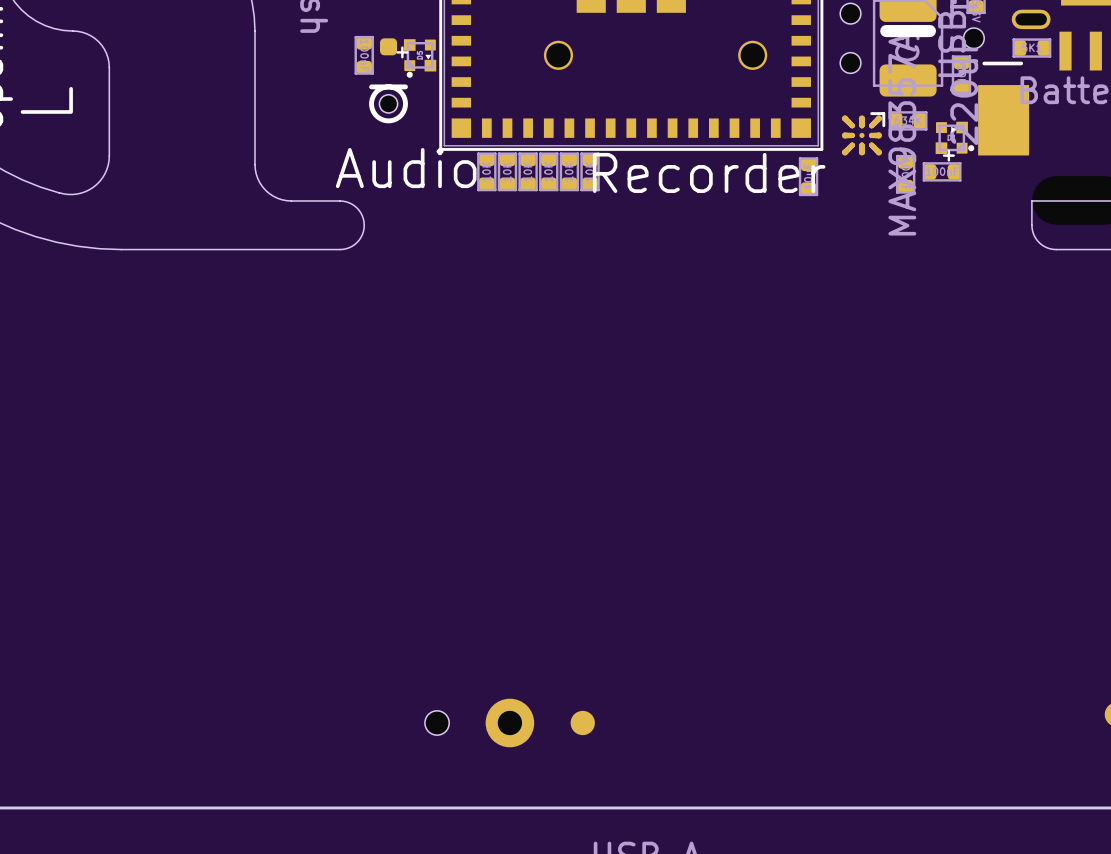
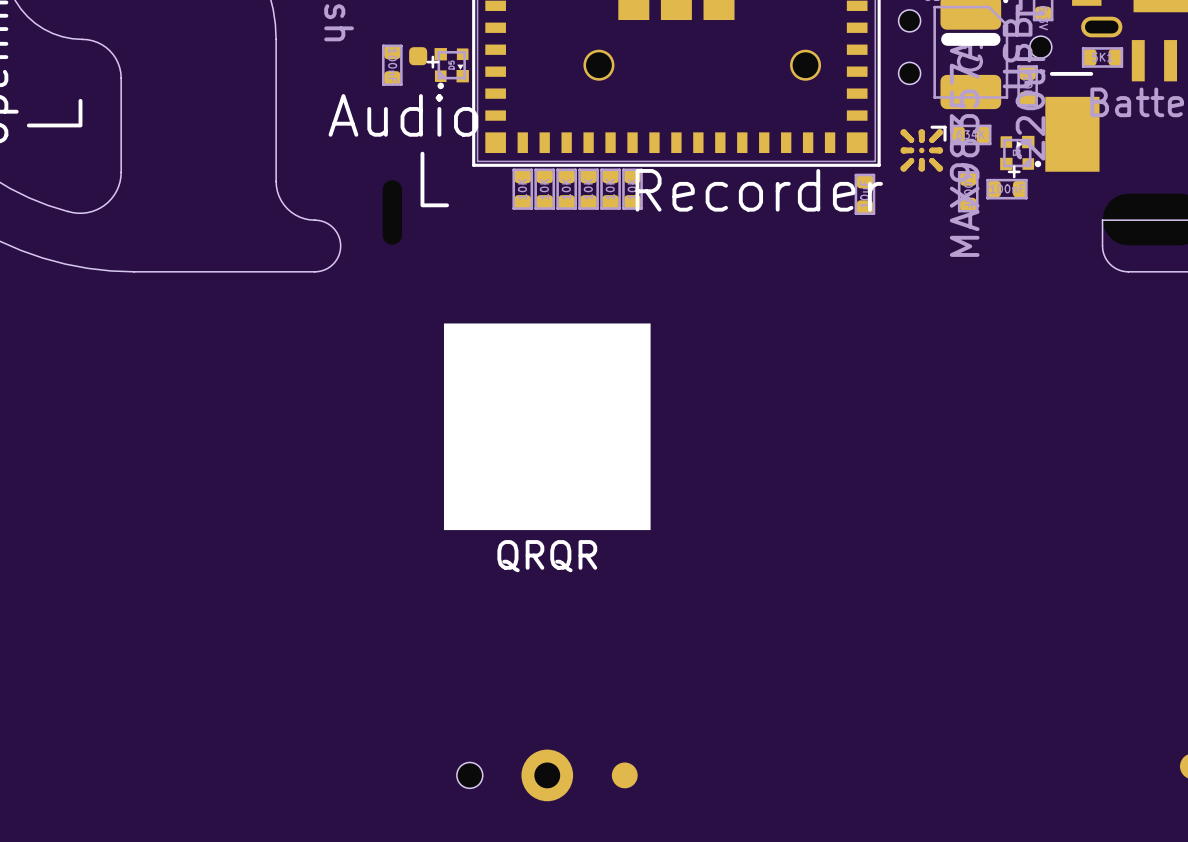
drawing: [369, 84, 408, 124] -> none
line: (371, 86) (405, 86) -> none
text: none -> Audio (403, 115)
part: (388, 103) -> none
text: Audio (406, 168) -> L (434, 179)
part: none -> (392, 212)
board edge: (291, 201) (346, 201) (359, 210) (364, 225) (359, 240) (346, 248) (291, 249) -> (314, 220) (324, 222) (333, 227) (338, 236) (340, 245) (338, 255) (333, 264) (324, 269) (314, 271)
drawing: none -> [443, 323, 651, 531]
text: none -> QRQR (547, 556)

